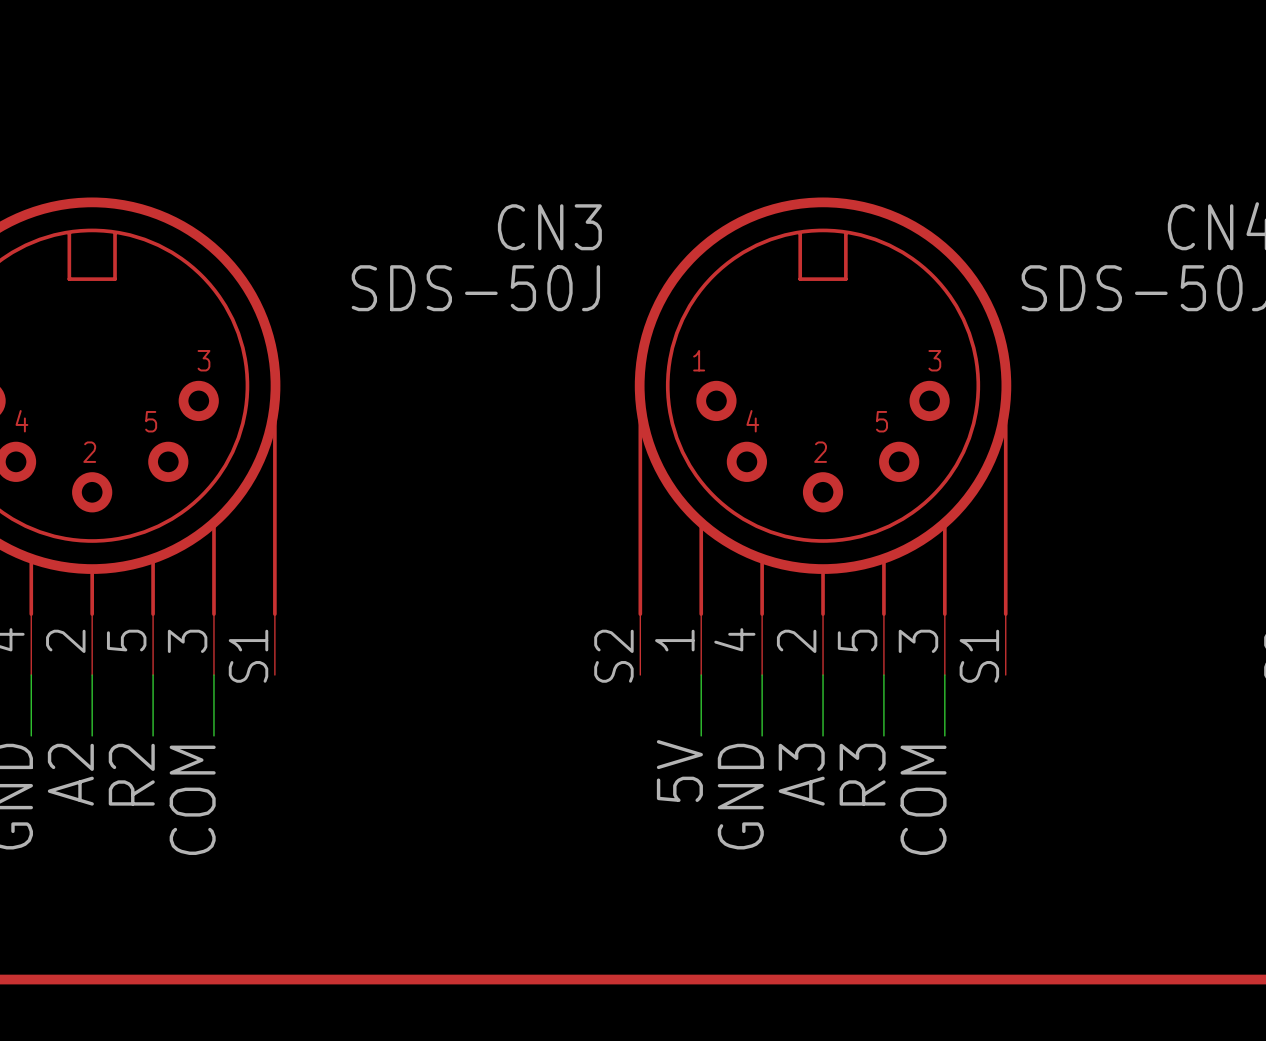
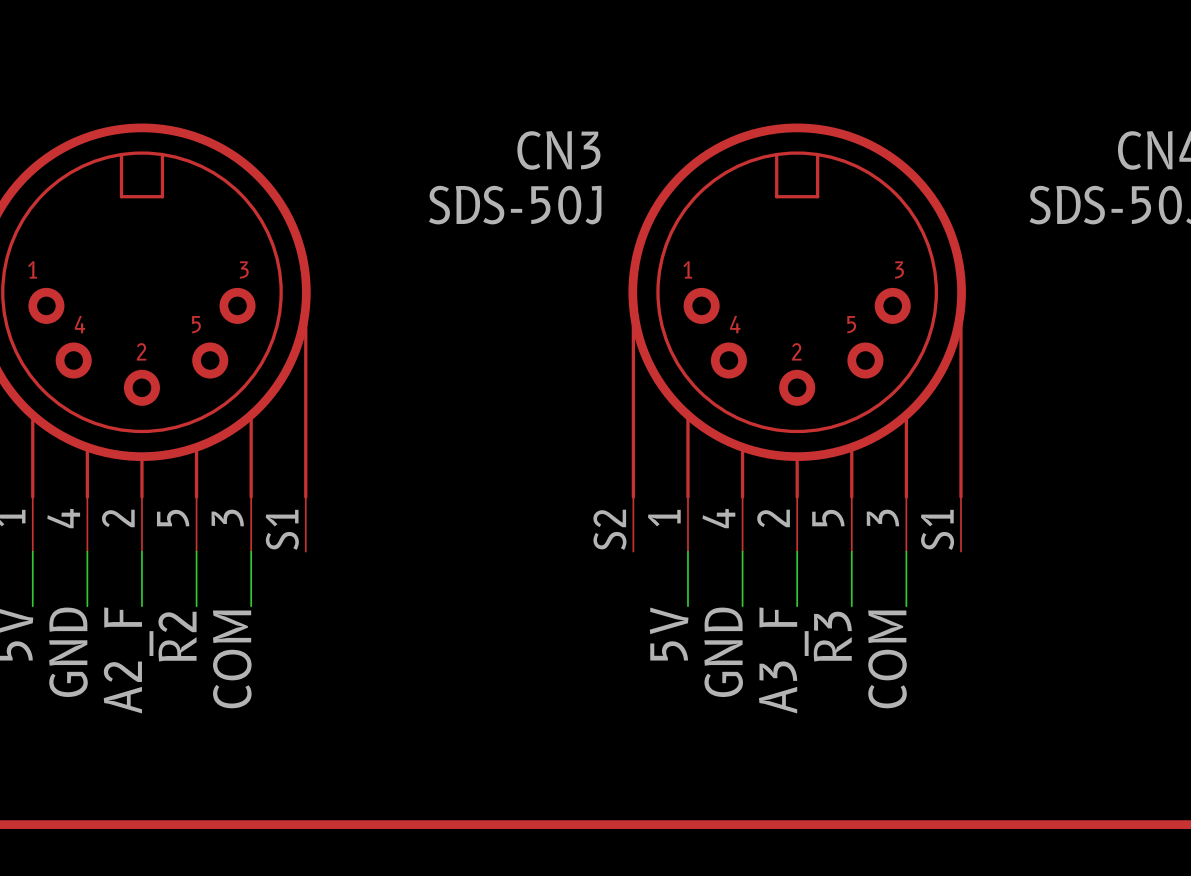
label: A2 (70, 774) -> A2_F (128, 660)
label: A3 (801, 774) -> A3_F (783, 660)

